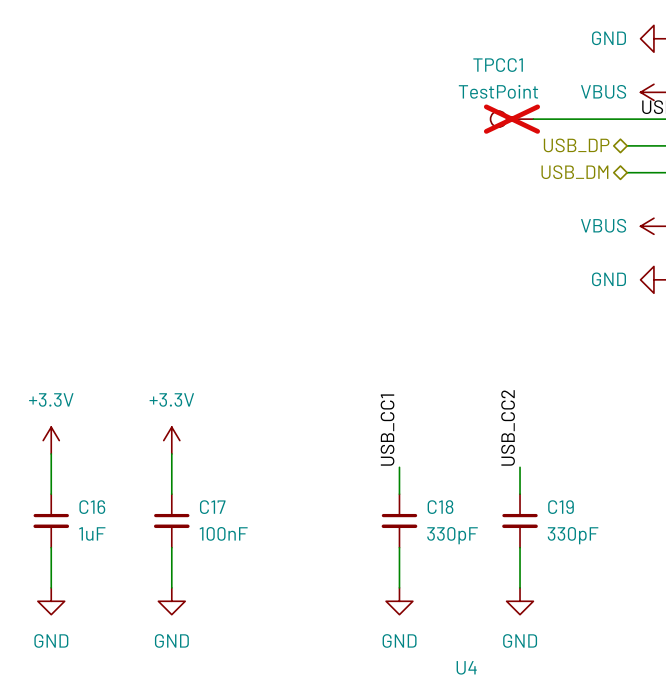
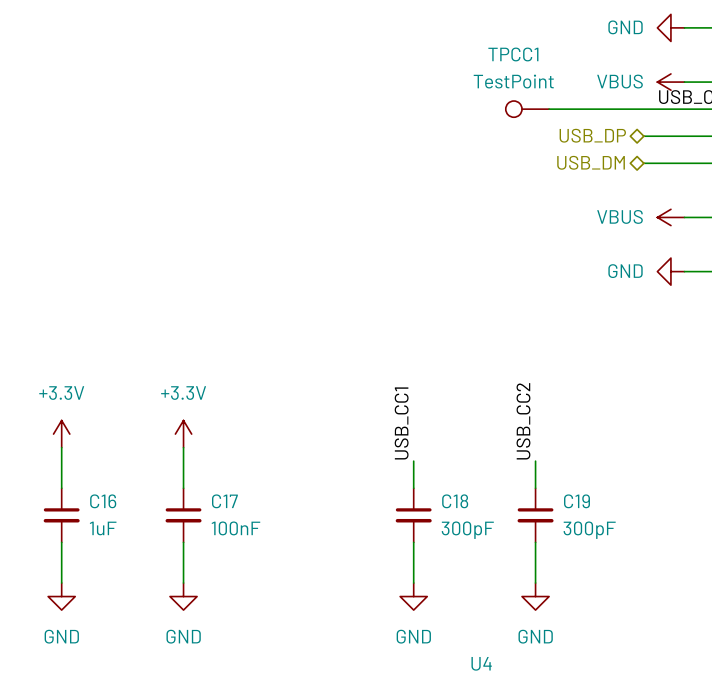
TPCC1 do-not-place cross: (511, 119) -> none
C18 value: 330pF (452, 535) -> 300pF (467, 530)
C19 value: 330pF (573, 535) -> 300pF (589, 530)

